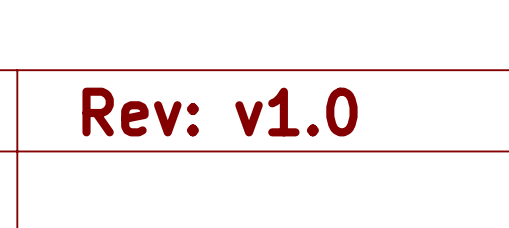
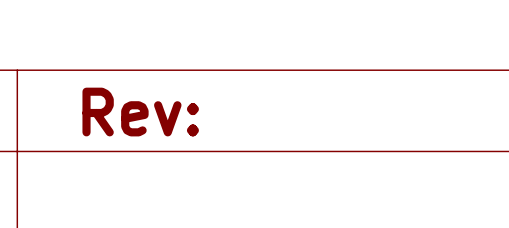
title block: Rev: v1.0 (220, 112) -> Rev: (140, 112)

